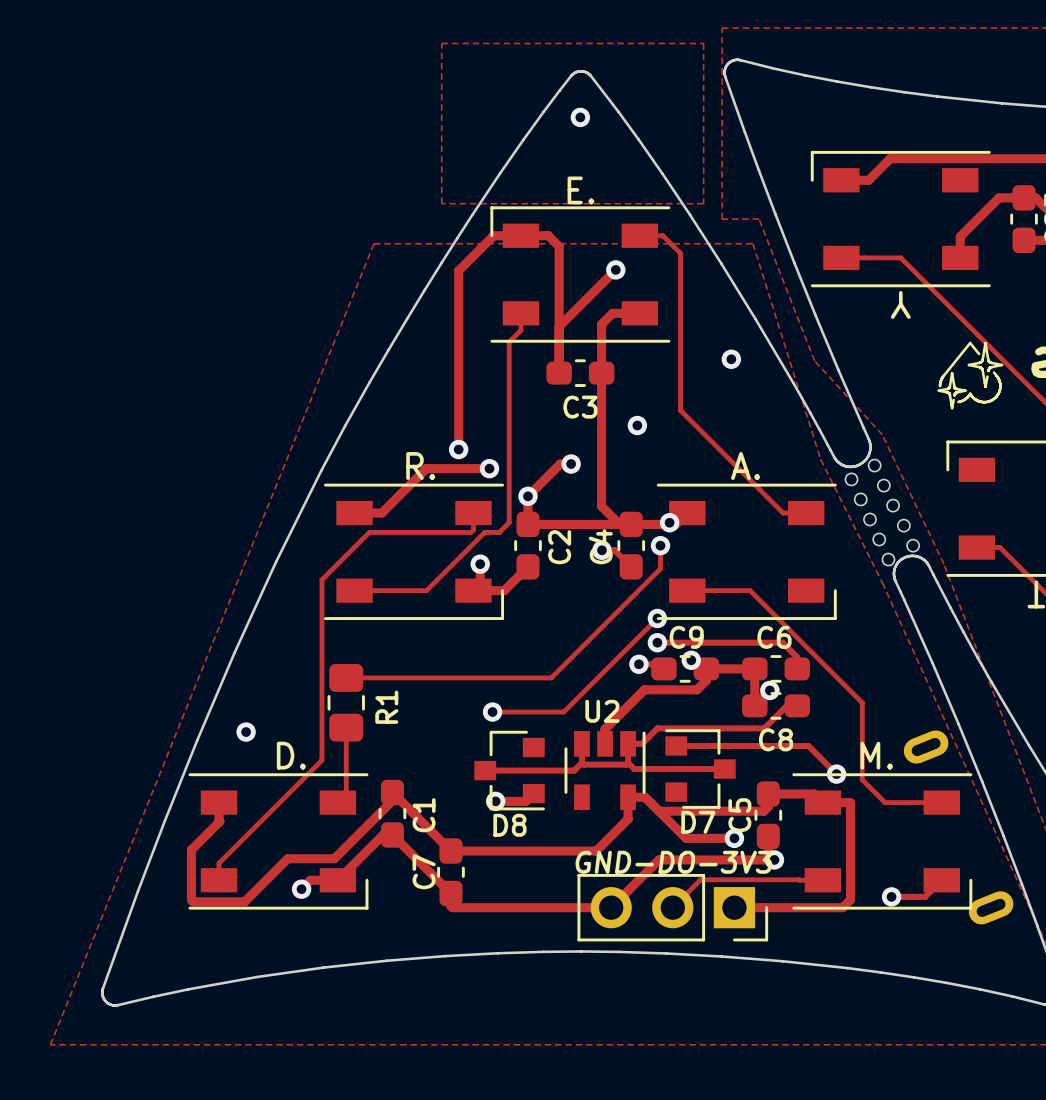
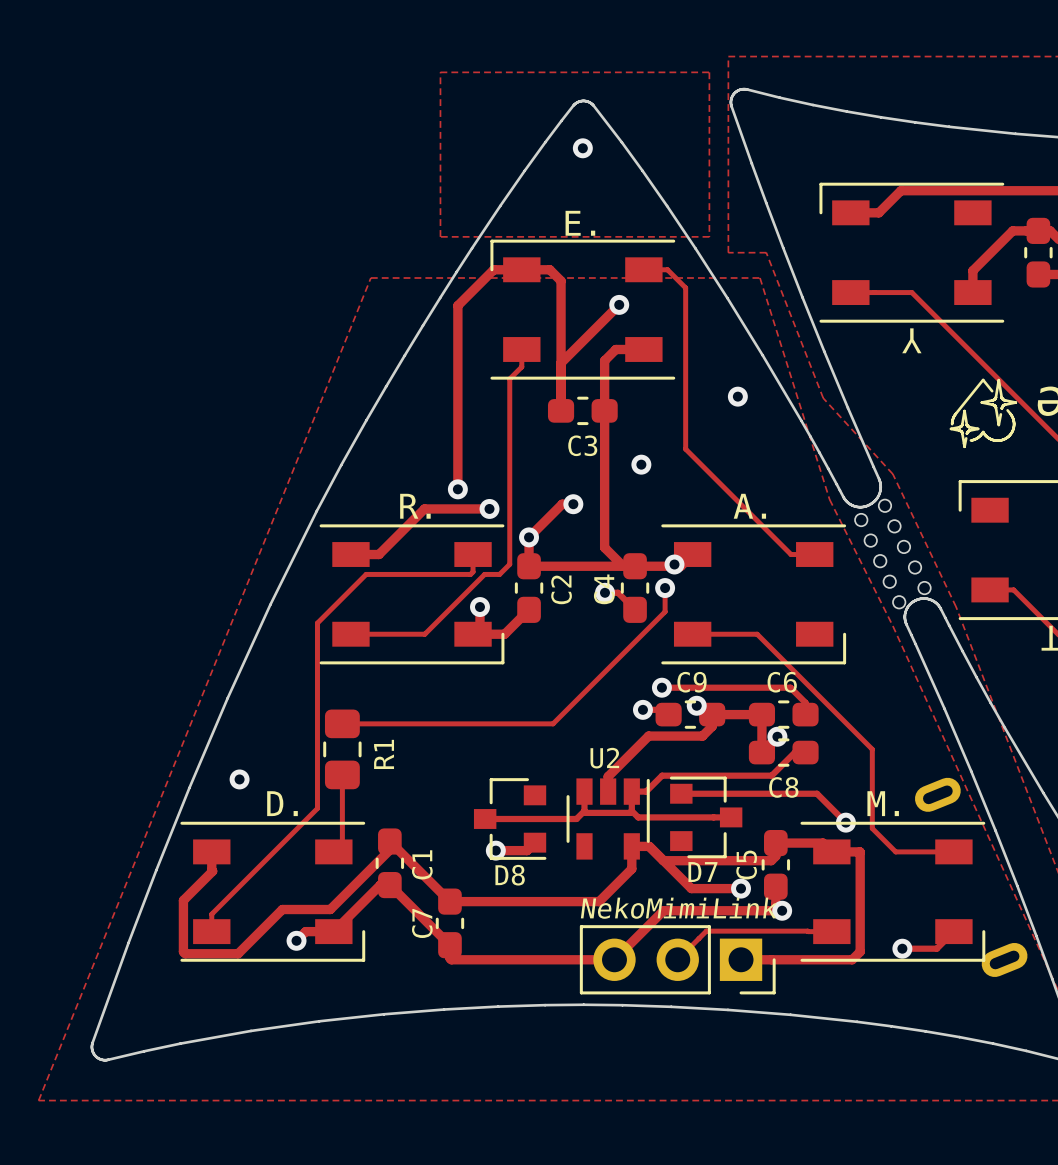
track: (657, 618) (563, 712) (492, 712) -> none
via: (657, 618) -> none
via: (492, 712) -> none
GND-DO-3V3 name: GND-DO-3V3 (674, 862) -> NekoMimiLink (678, 908)

